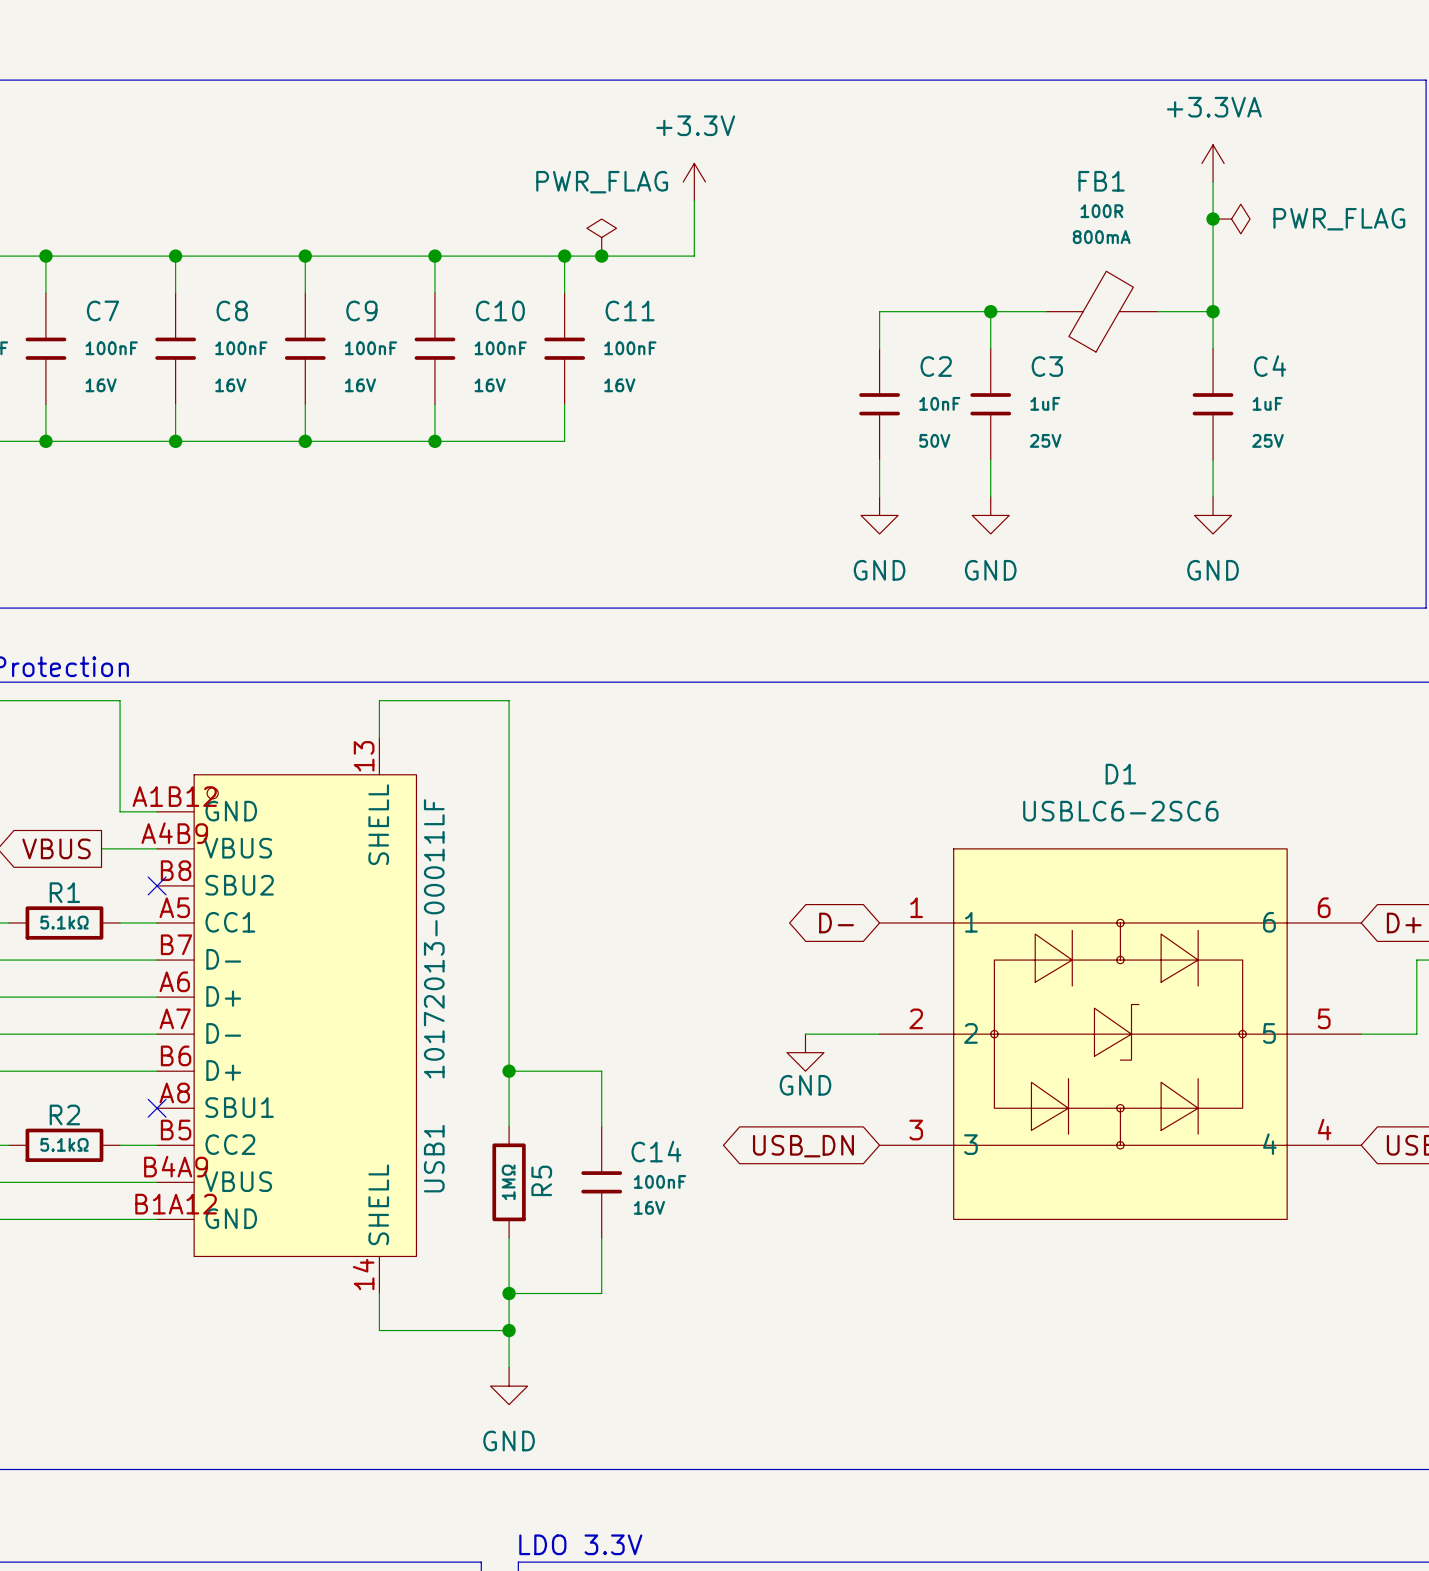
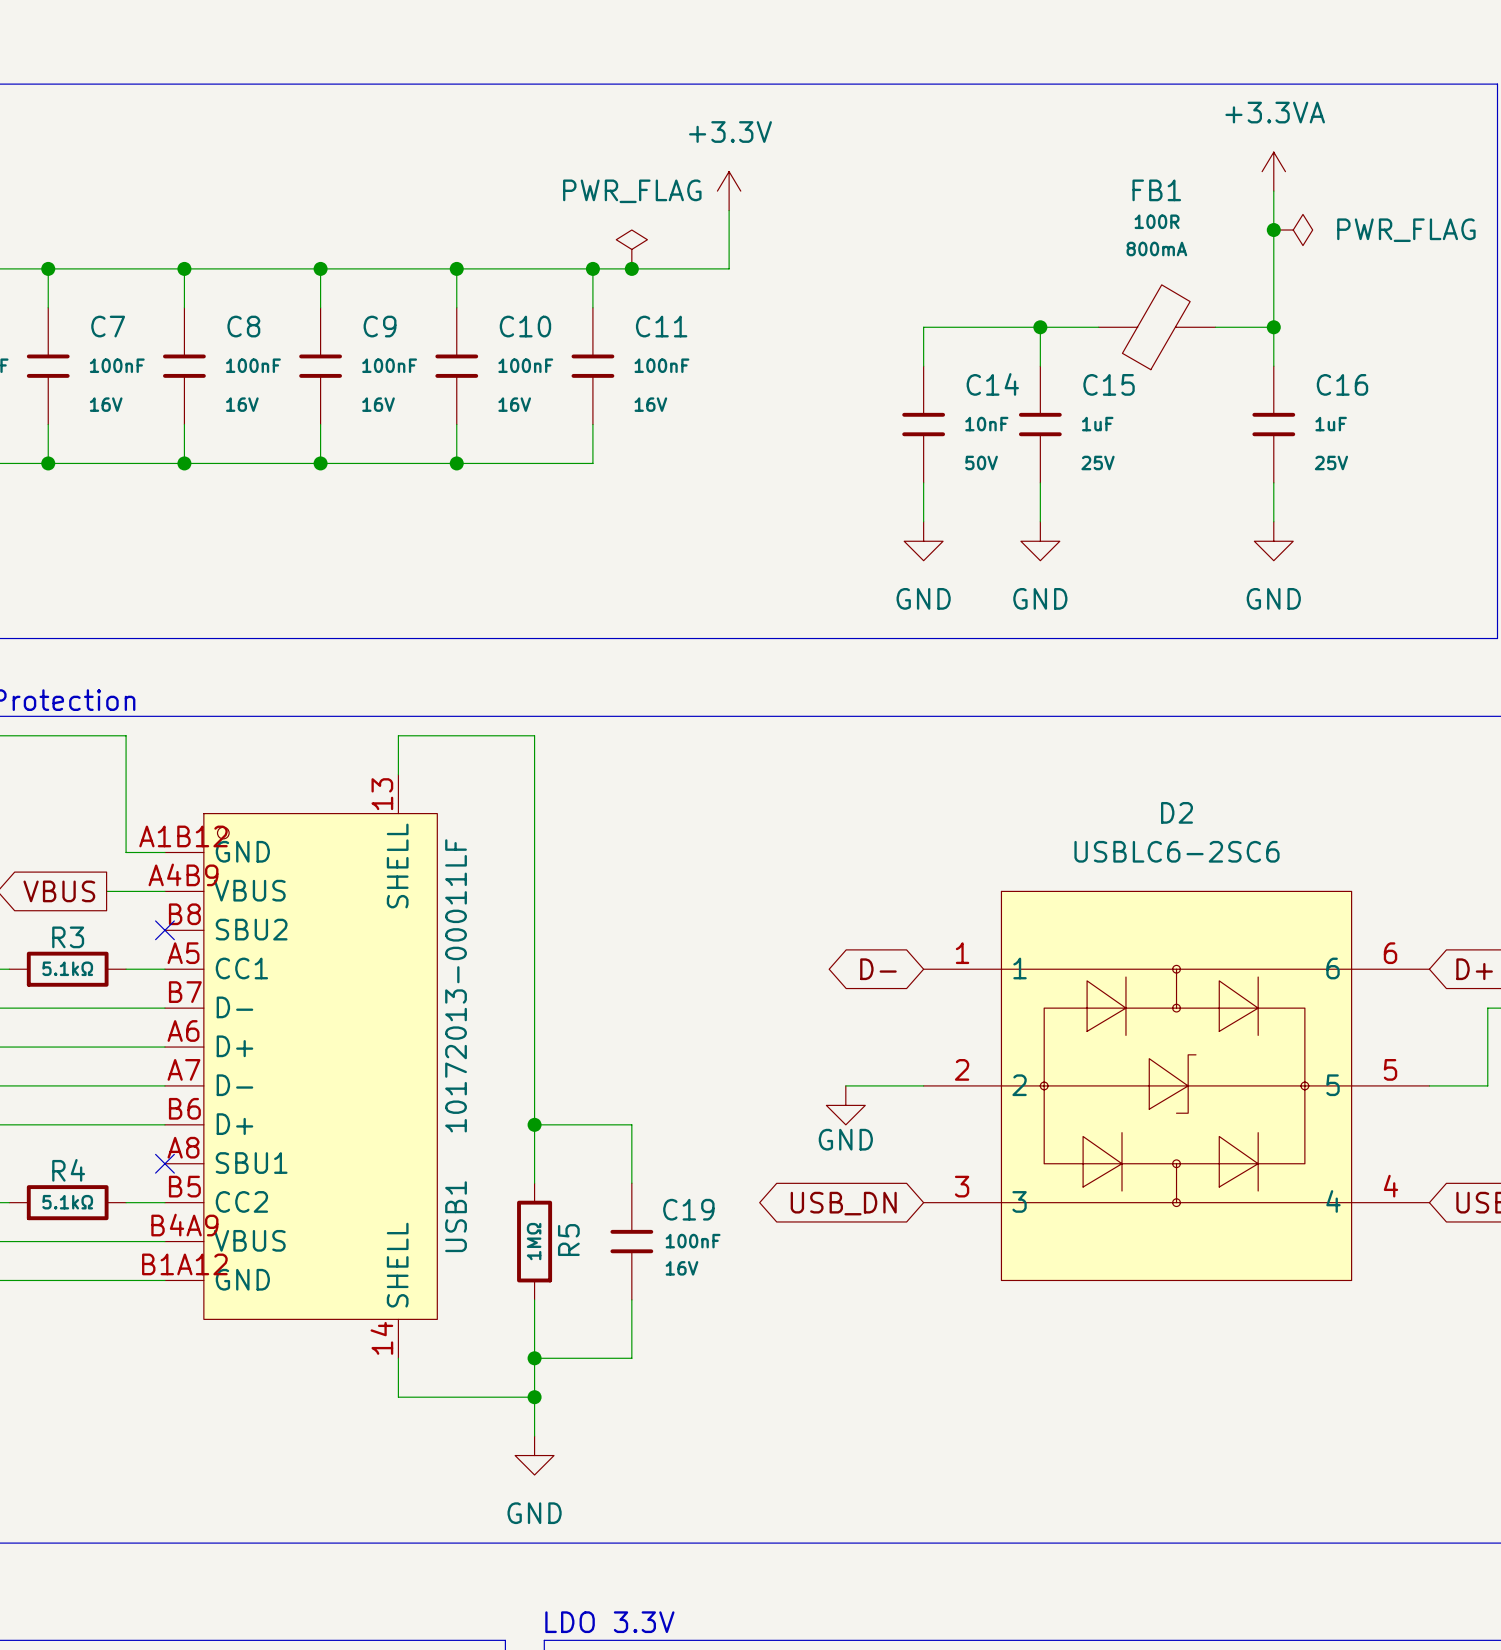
C2 name: C2 (936, 366) -> C14 (992, 384)
C3 name: C3 (1047, 366) -> C15 (1109, 384)
C4 name: C4 (1270, 366) -> C16 (1342, 384)
D1 name: D1 (1120, 774) -> D2 (1176, 812)
R1 name: R1 (64, 892) -> R3 (68, 937)
R2 name: R2 (64, 1114) -> R4 (68, 1170)
C14 name: C14 (656, 1151) -> C19 (688, 1209)

